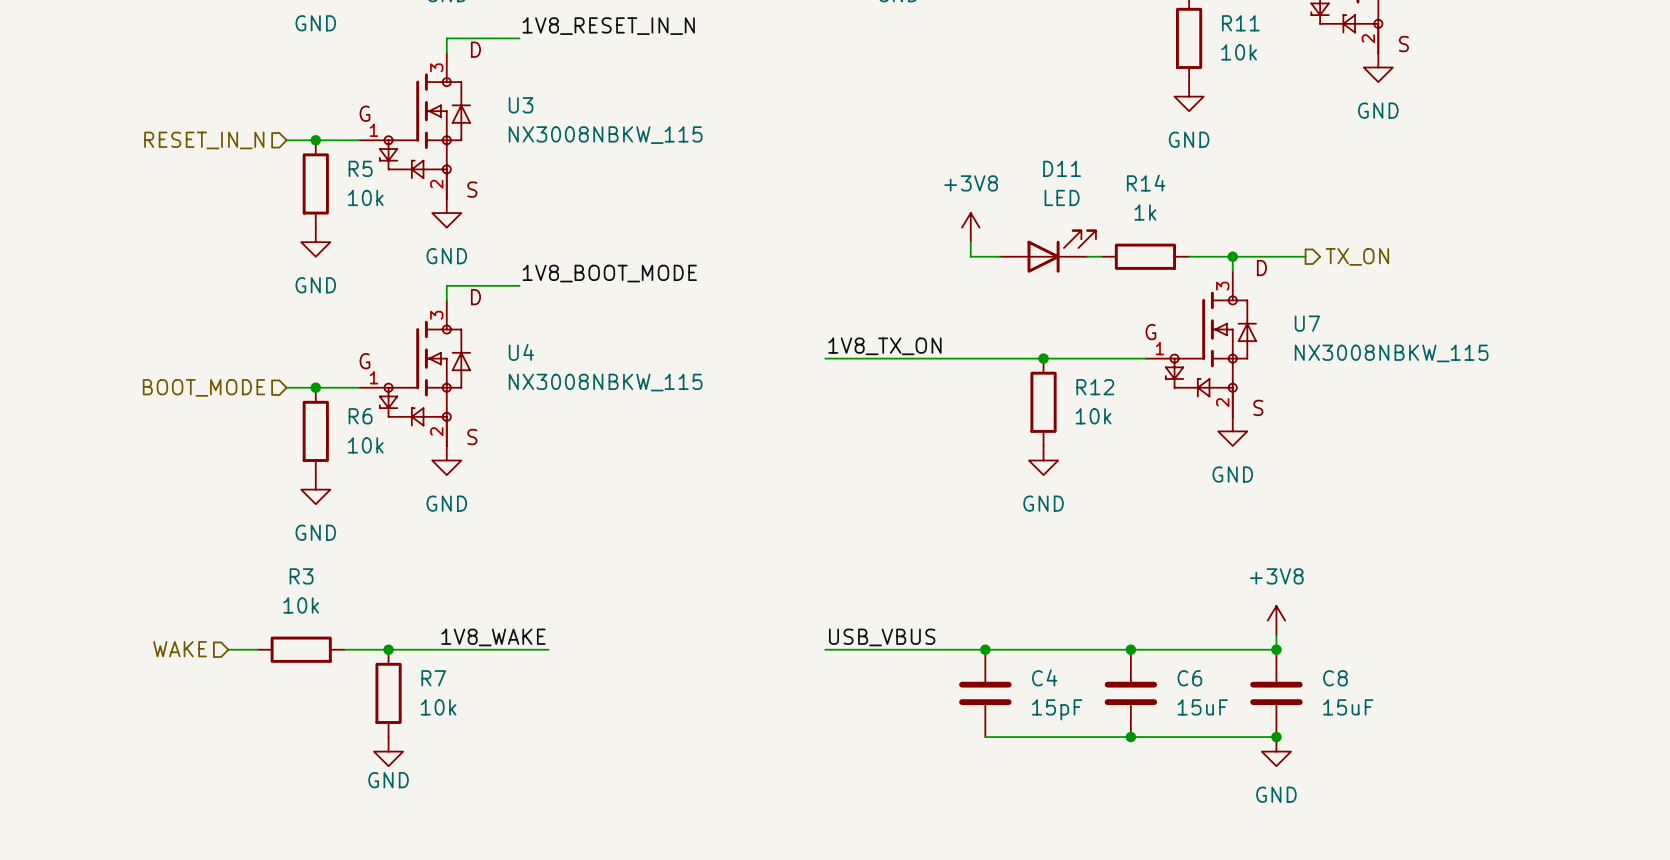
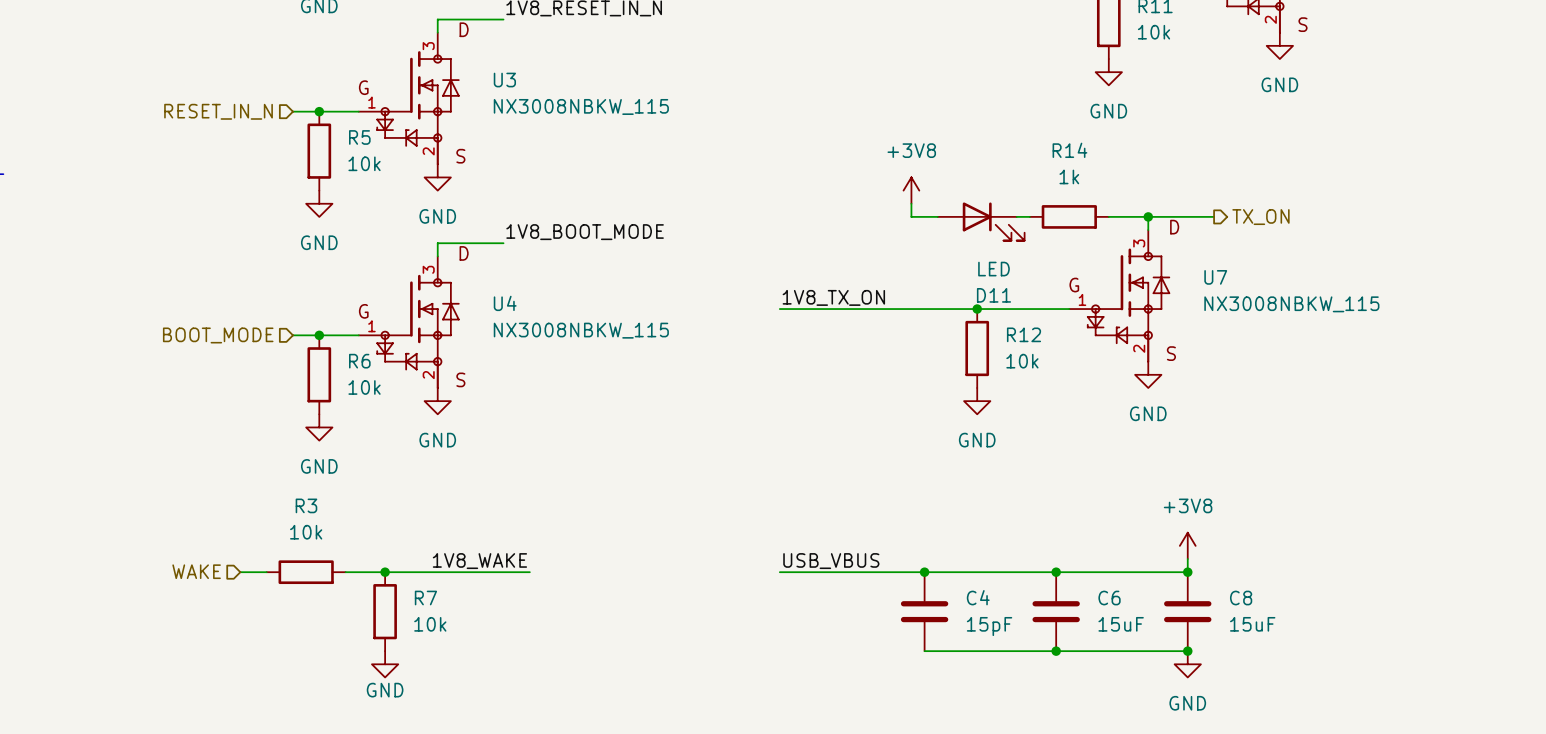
D11 flip: as is (1061, 251) -> up-down (993, 221)

